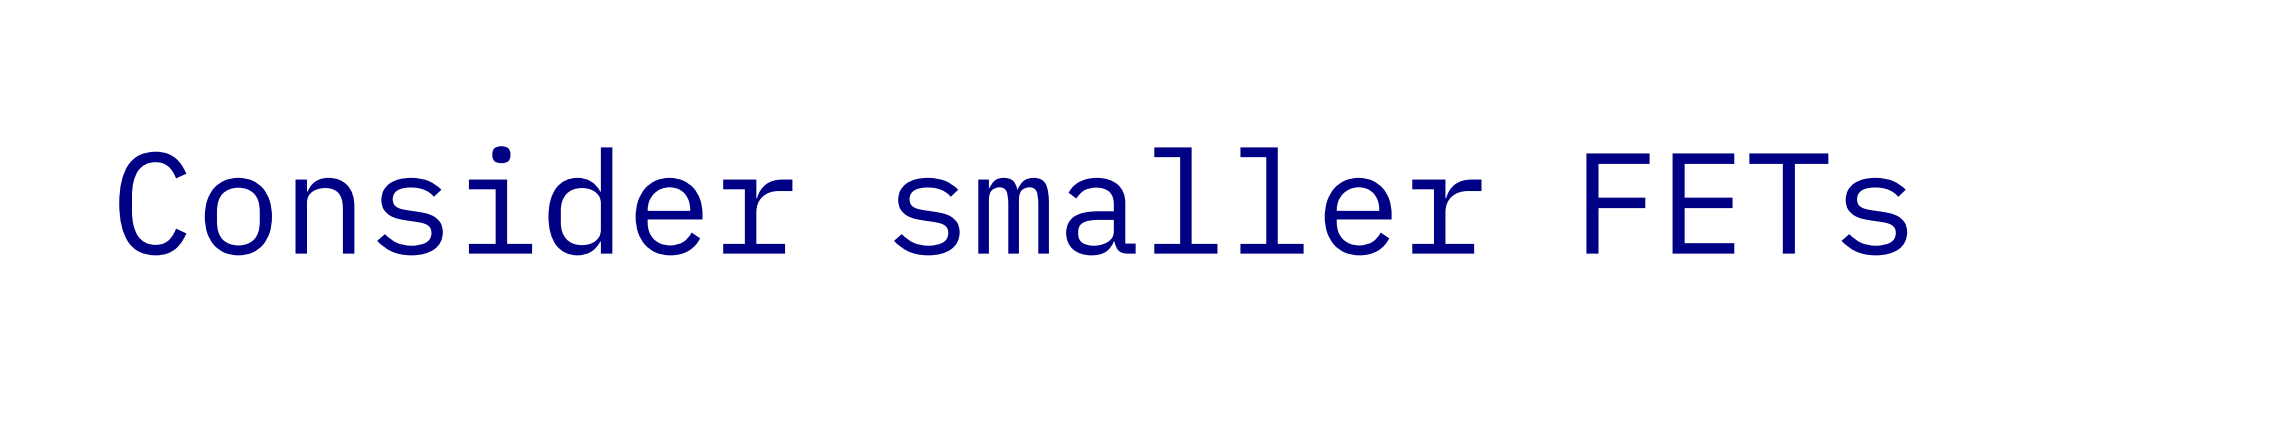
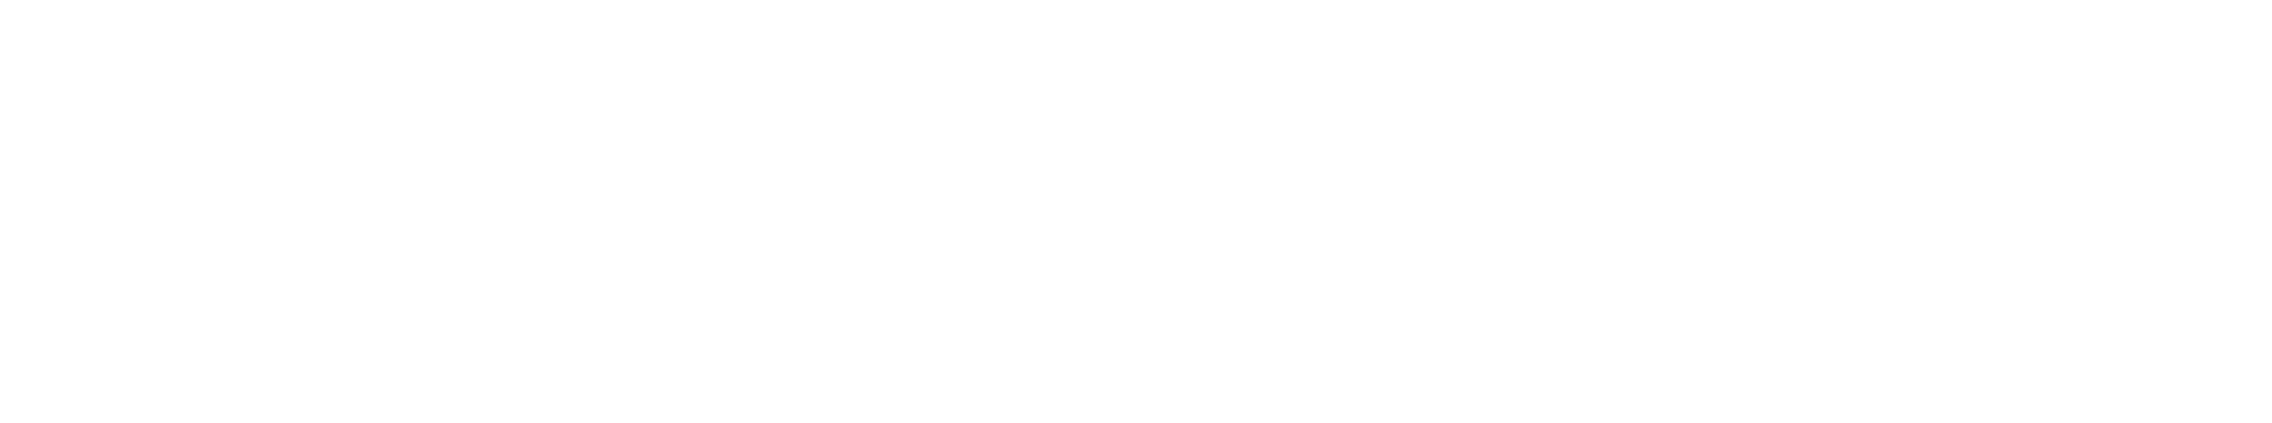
text: Consider smaller FETs (1013, 200) -> none

